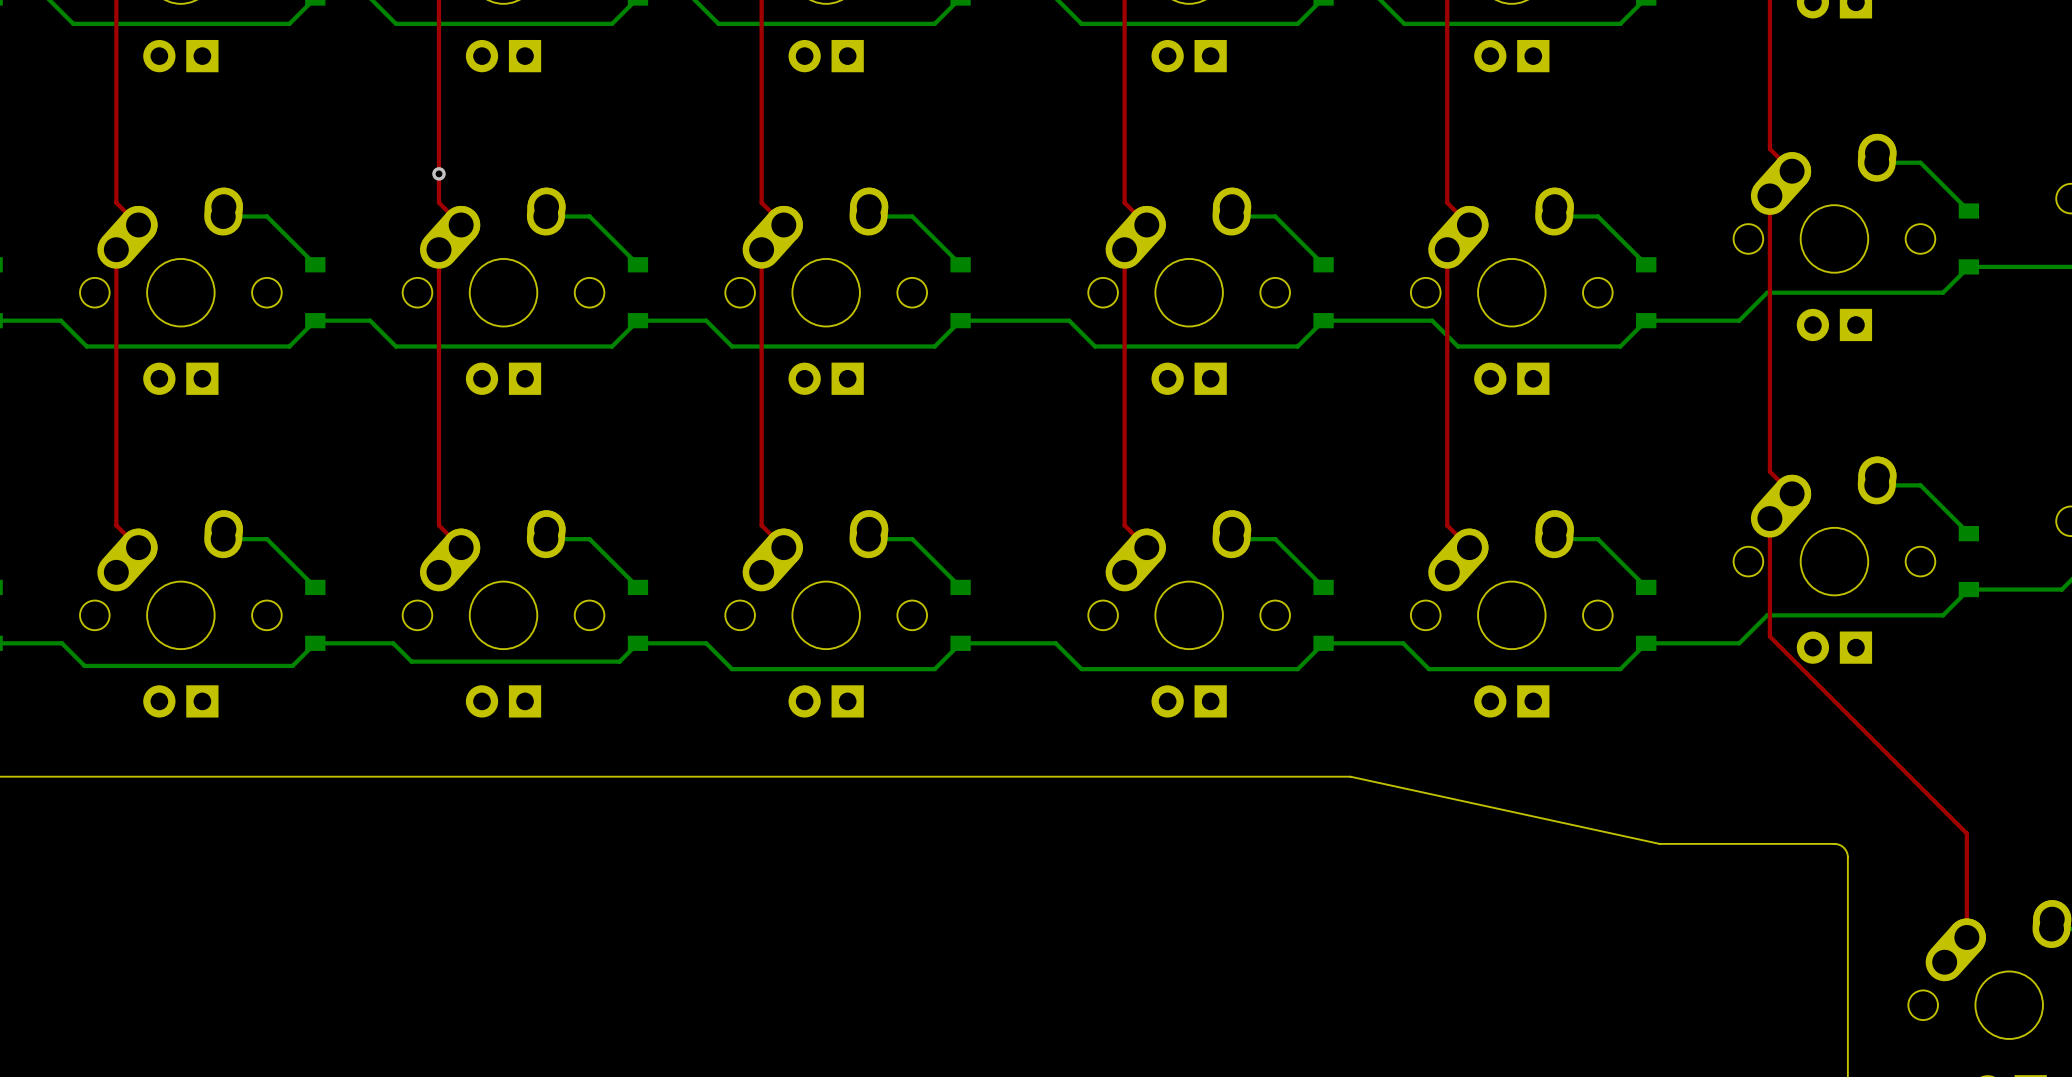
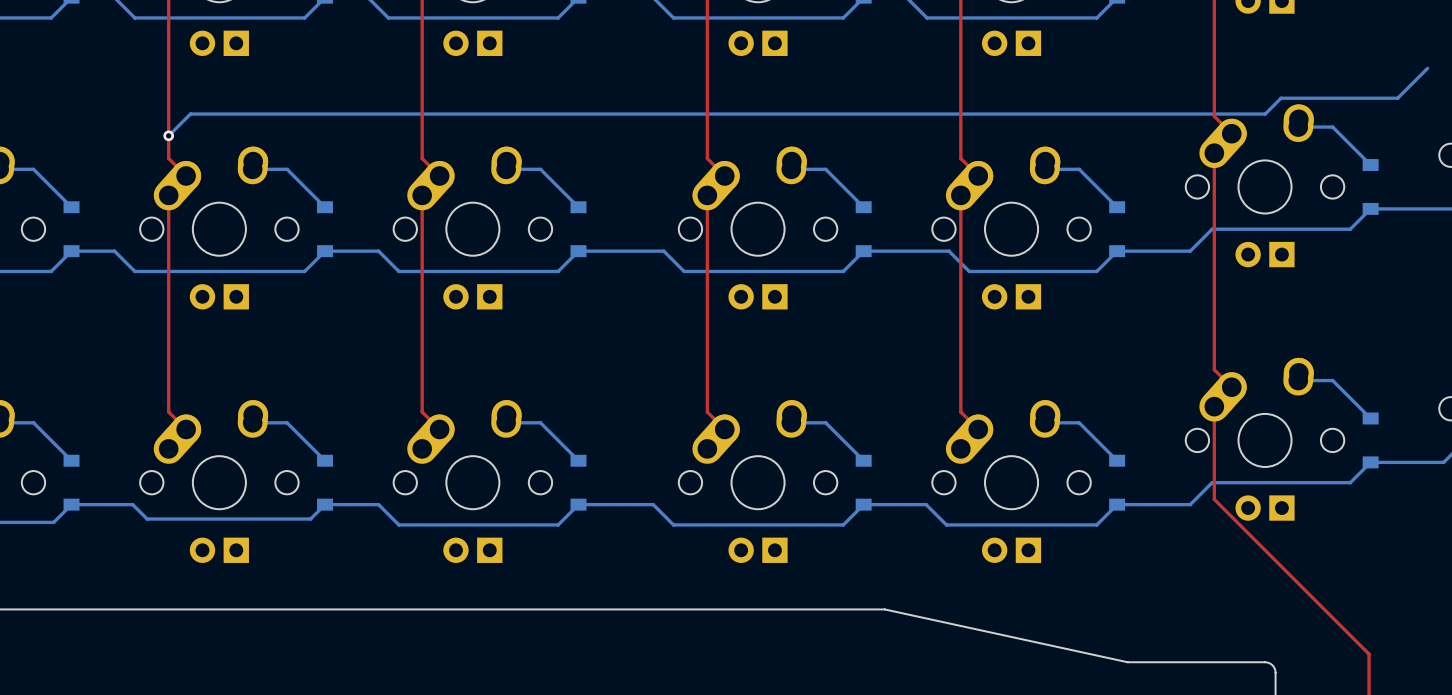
bottom track: none -> (1427, 68) (1397, 98) (1281, 98) (1265, 114) (190, 114) (168, 135)

